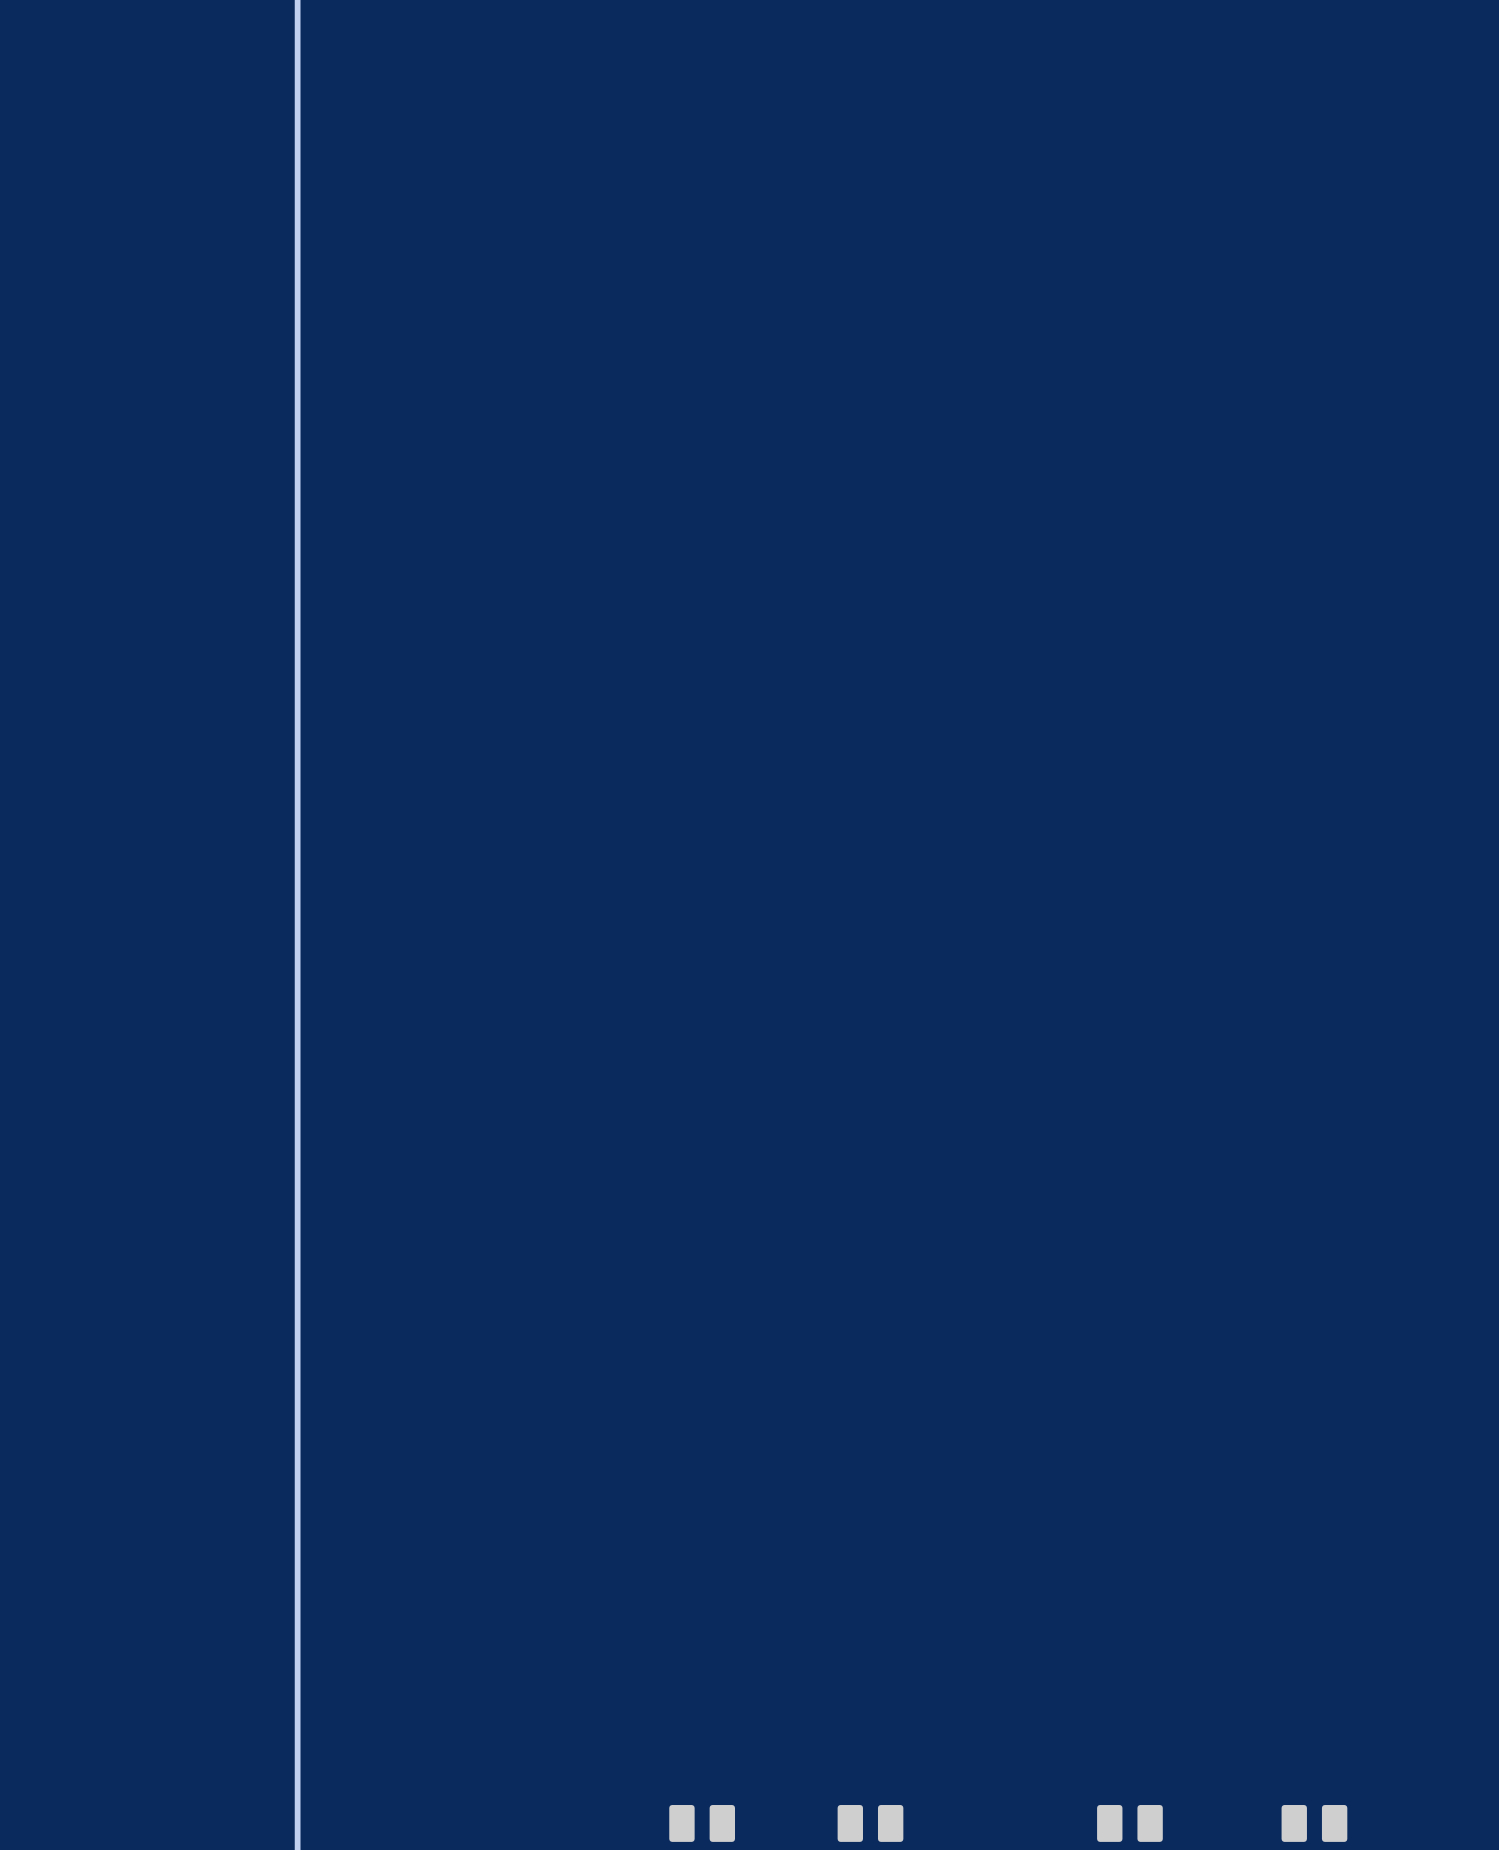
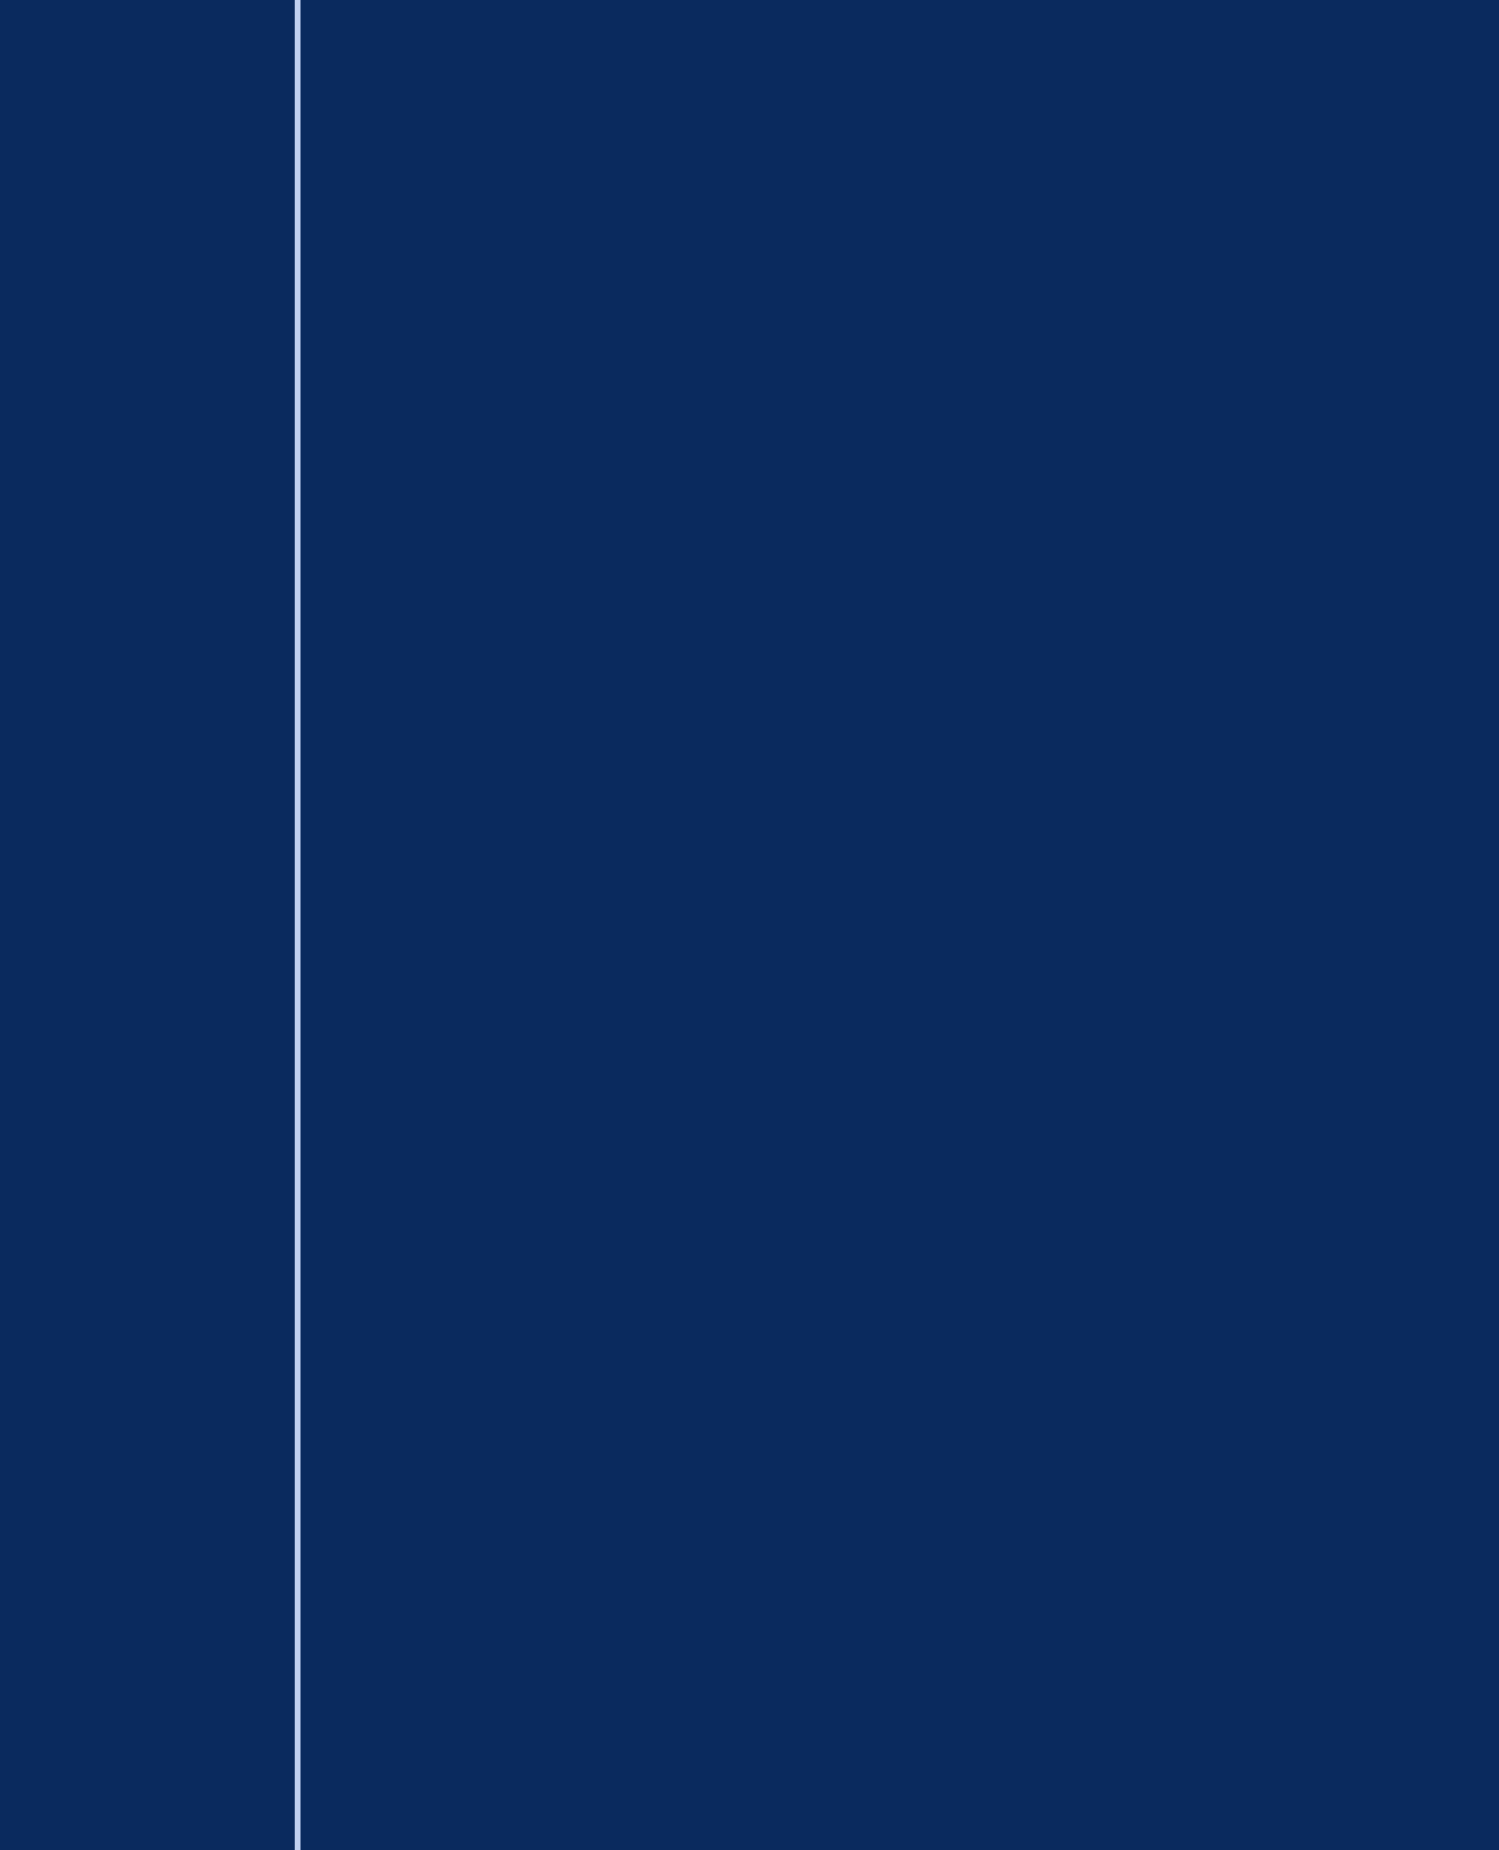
part: (702, 1823) -> none
part: (870, 1823) -> none
part: (1129, 1823) -> none
part: (1314, 1823) -> none

